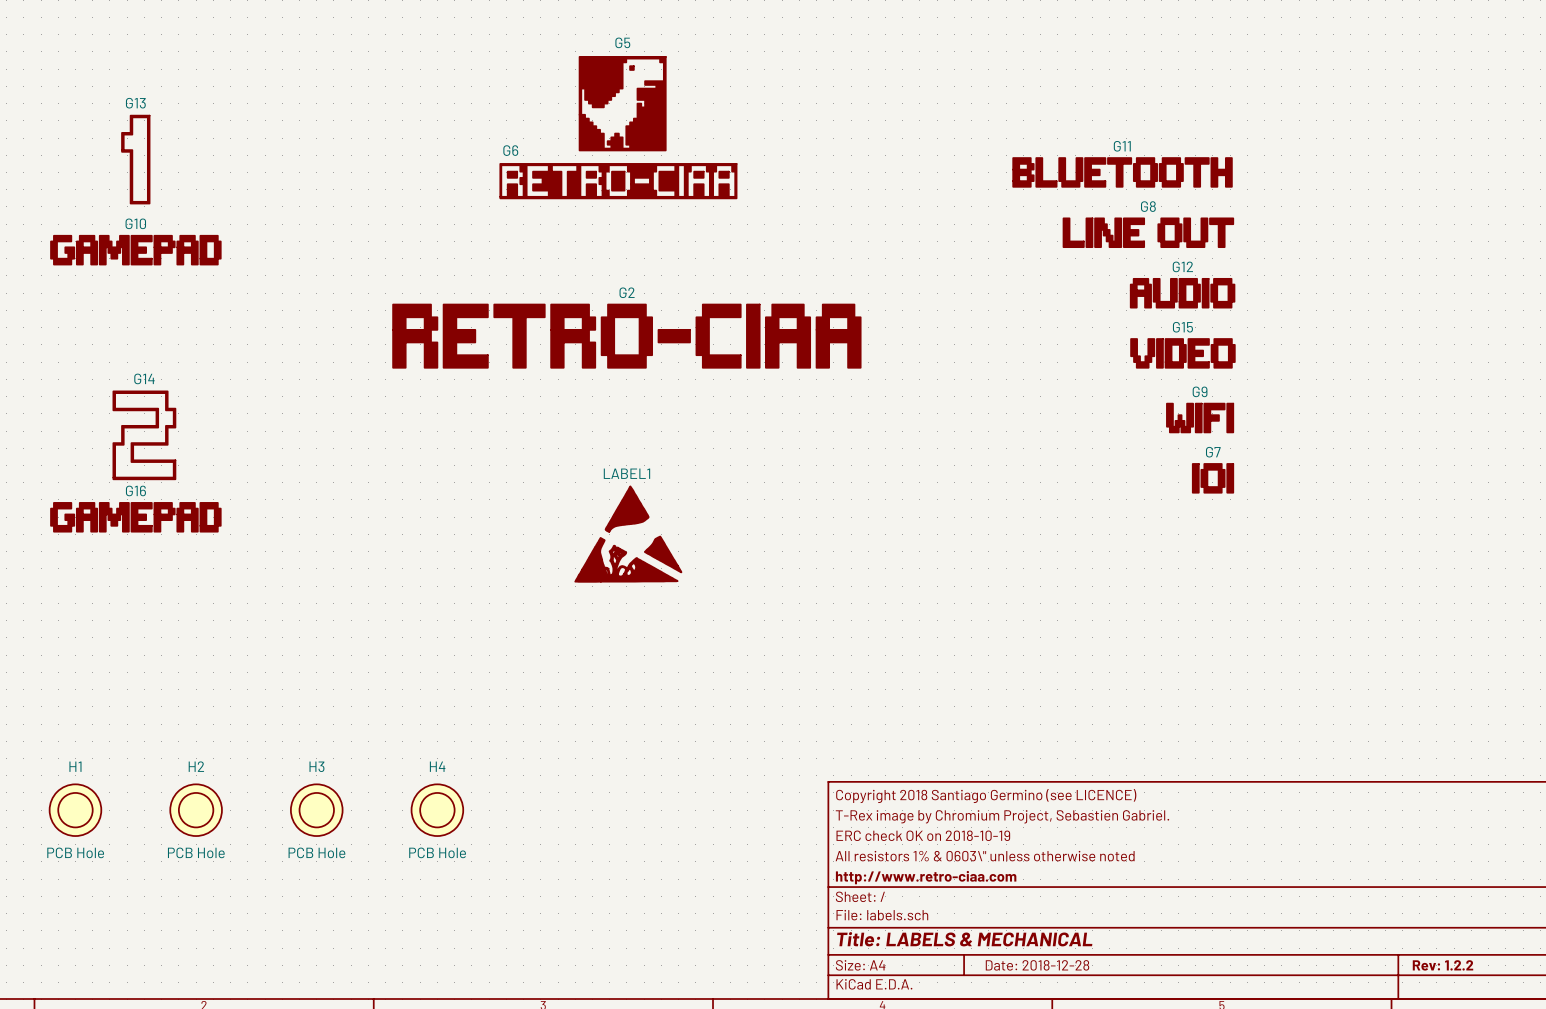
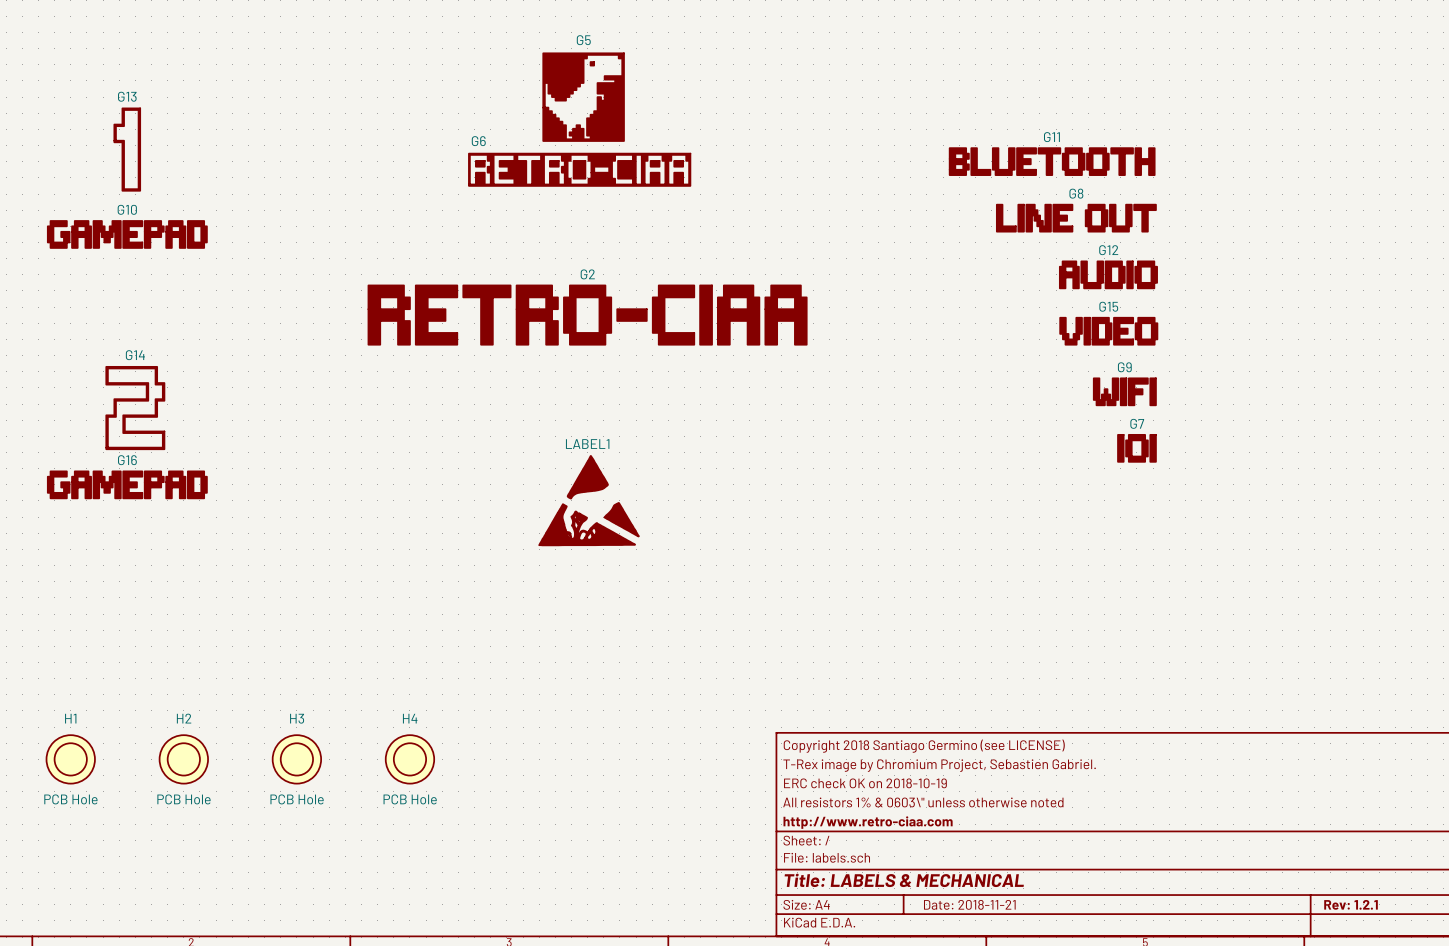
title block: Copyright 2018 Santiago Germino (see LICENCE) (986, 796) -> Copyright 2018 Santiago Germino (see LICENSE) (924, 746)
title block: Date: 2018-12-28 (1037, 965) -> Date: 2018-11-21 (969, 904)
title block: Rev: 1.2.2 (1442, 965) -> Rev: 1.2.1 (1351, 904)

